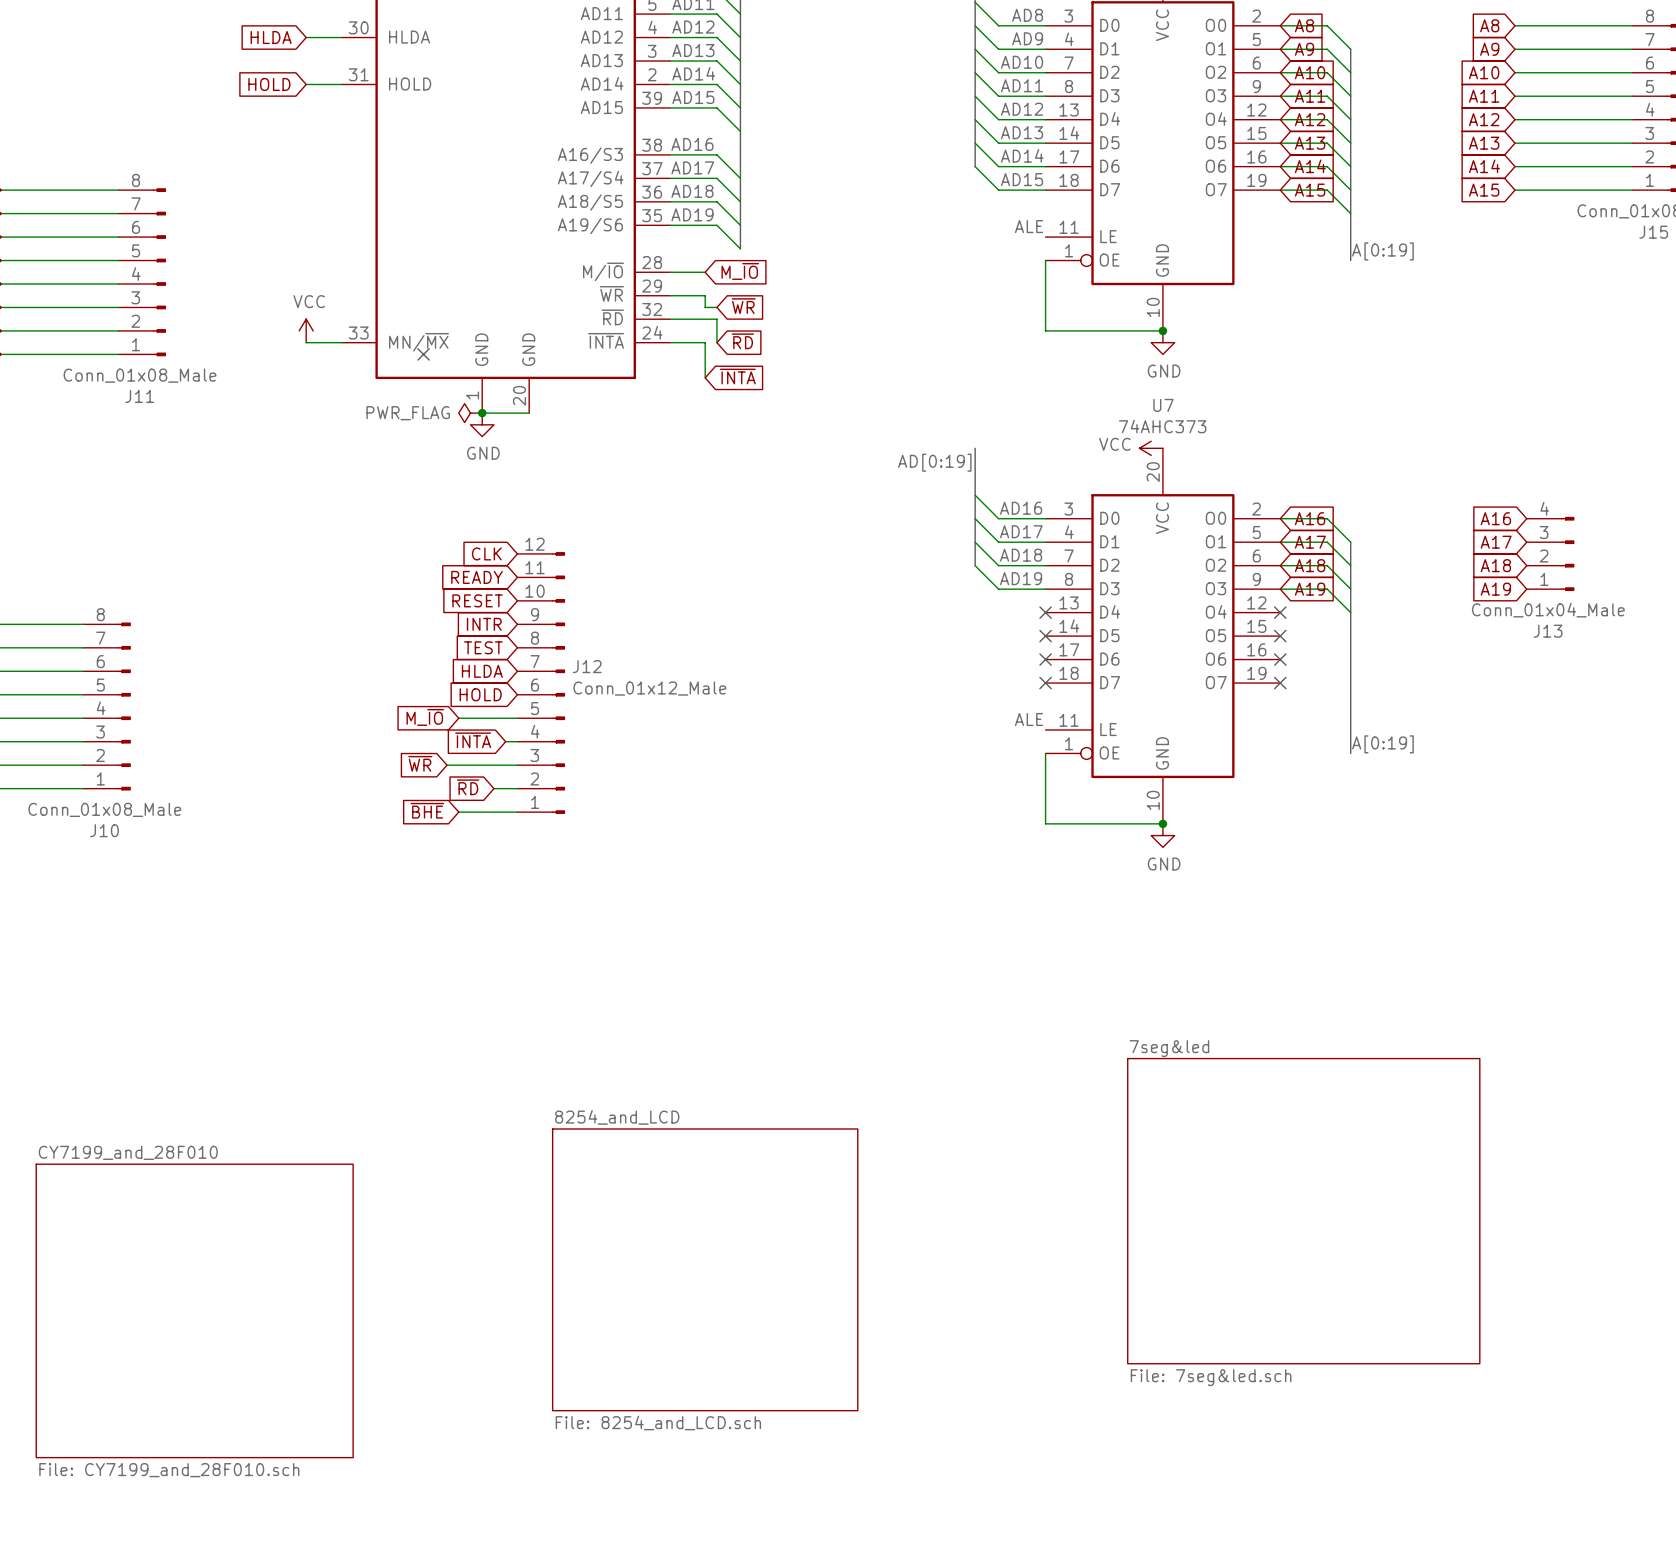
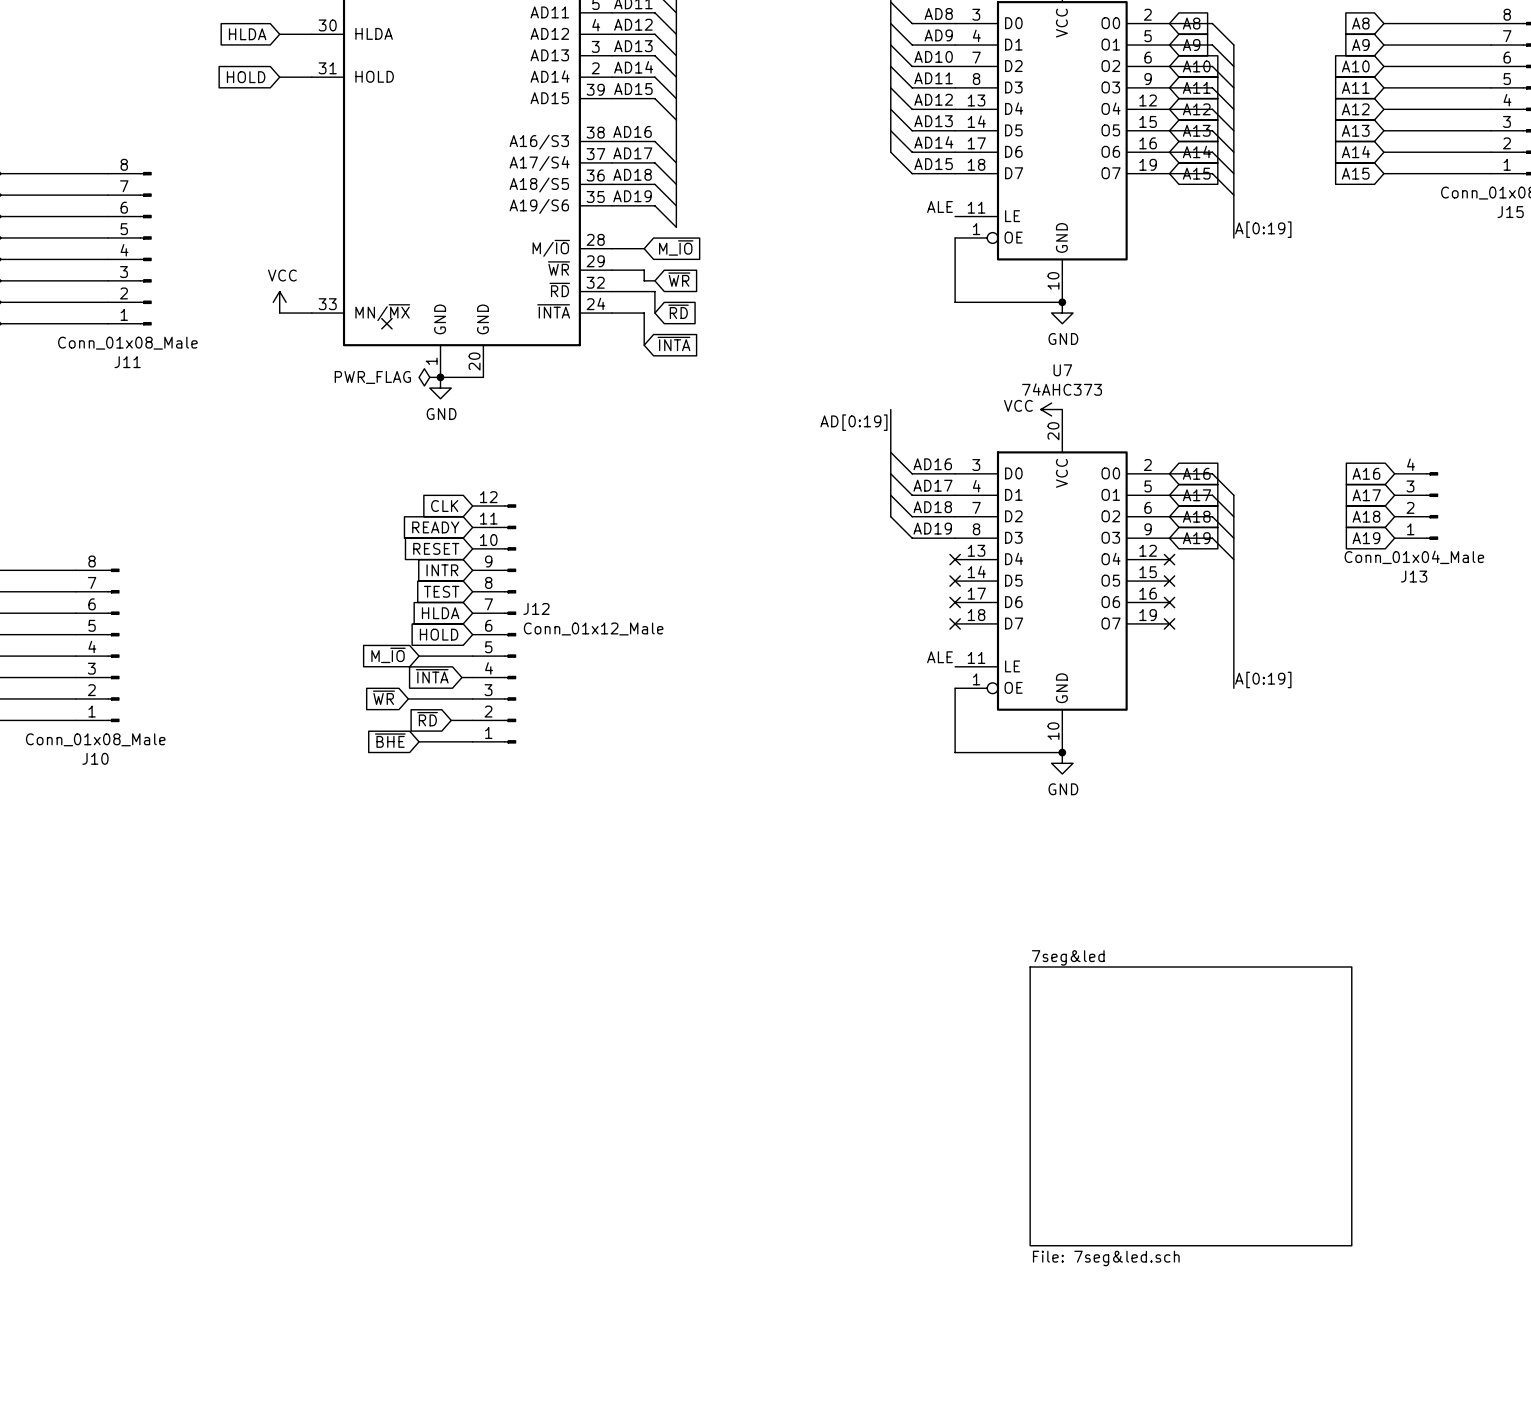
sheet 8254_and_LCD: File: 8254_and_LCD.sch (705, 1269) -> none
sheet CY7199_and_28F010: File: CY7199_and_28F010.sch (194, 1310) -> none

